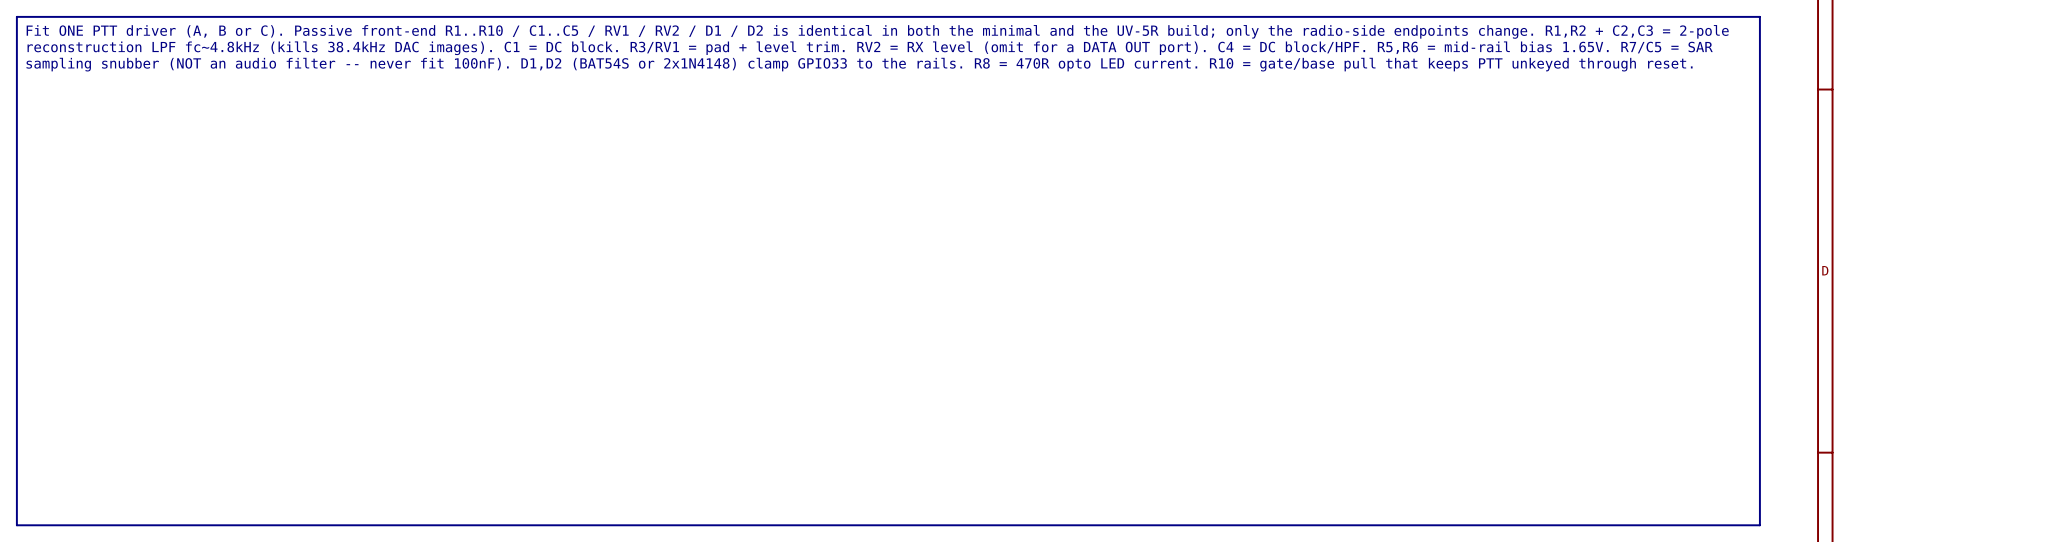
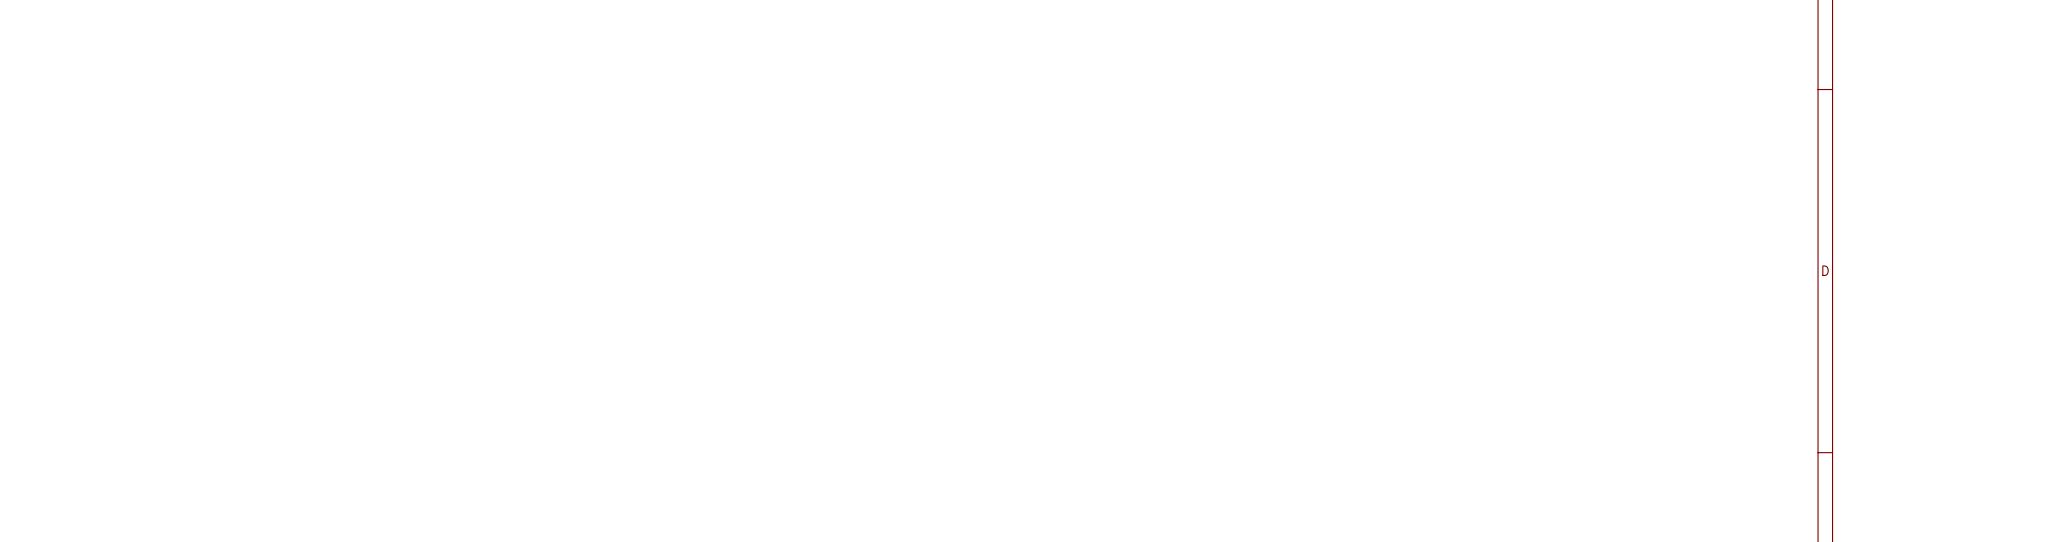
line: (16, 16) (1759, 16) (1759, 525) (16, 525) (16, 16) -> none
text: Fit ONE PTT driver (A, B or C). Passive front-end R1..R10 / C1..C5 / RV1 / RV2 / D1 / D2 is identical in both the minimal and the UV-5R build; only the radio-side endpoints change. R1,R2 + C2,C3 = 2-pole (877, 31) -> none
text: reconstruction LPF fc~4.8kHz (kills 38.4kHz DAC images). C1 = DC block. R3/RV1 = pad + level trim. RV2 = RX level (omit for a DATA OUT port). C4 = DC block/HPF. R5,R6 = mid-rail bias 1.65V. R7/C5 = SAR (870, 48) -> none
text: sampling snubber (NOT an audio filter -- never fit 100nF). D1,D2 (BAT54S or 2x1N4148) clamp GPIO33 to the rails. R8 = 470R opto LED current. R10 = gate/base pull that keeps PTT unkeyed through reset. (859, 64) -> none

